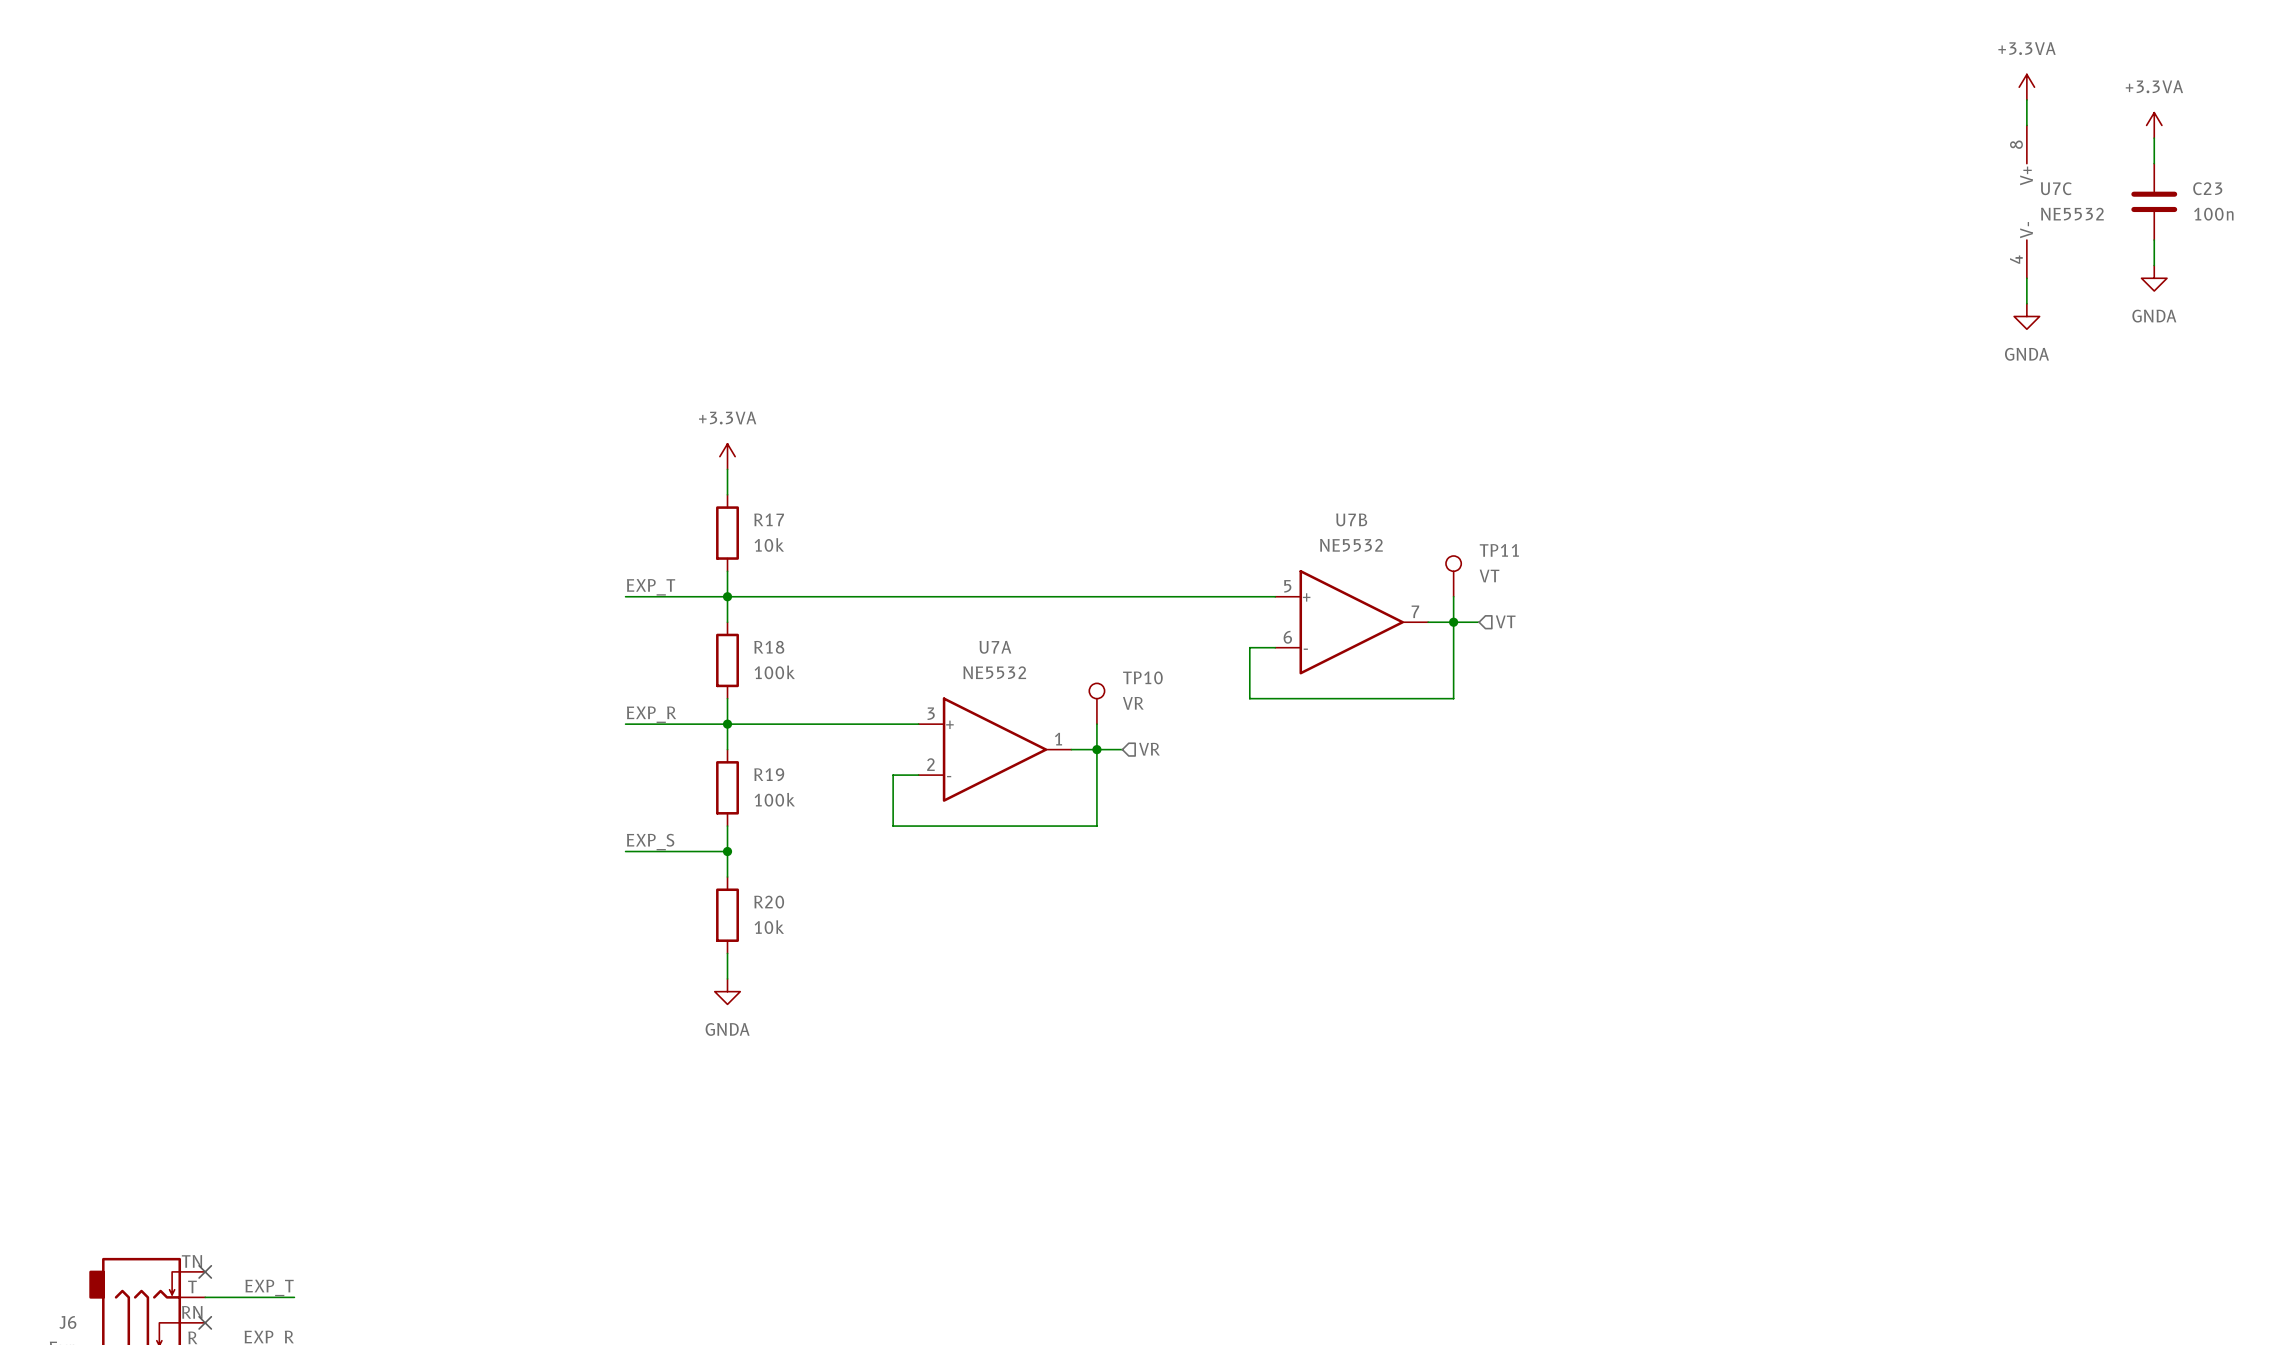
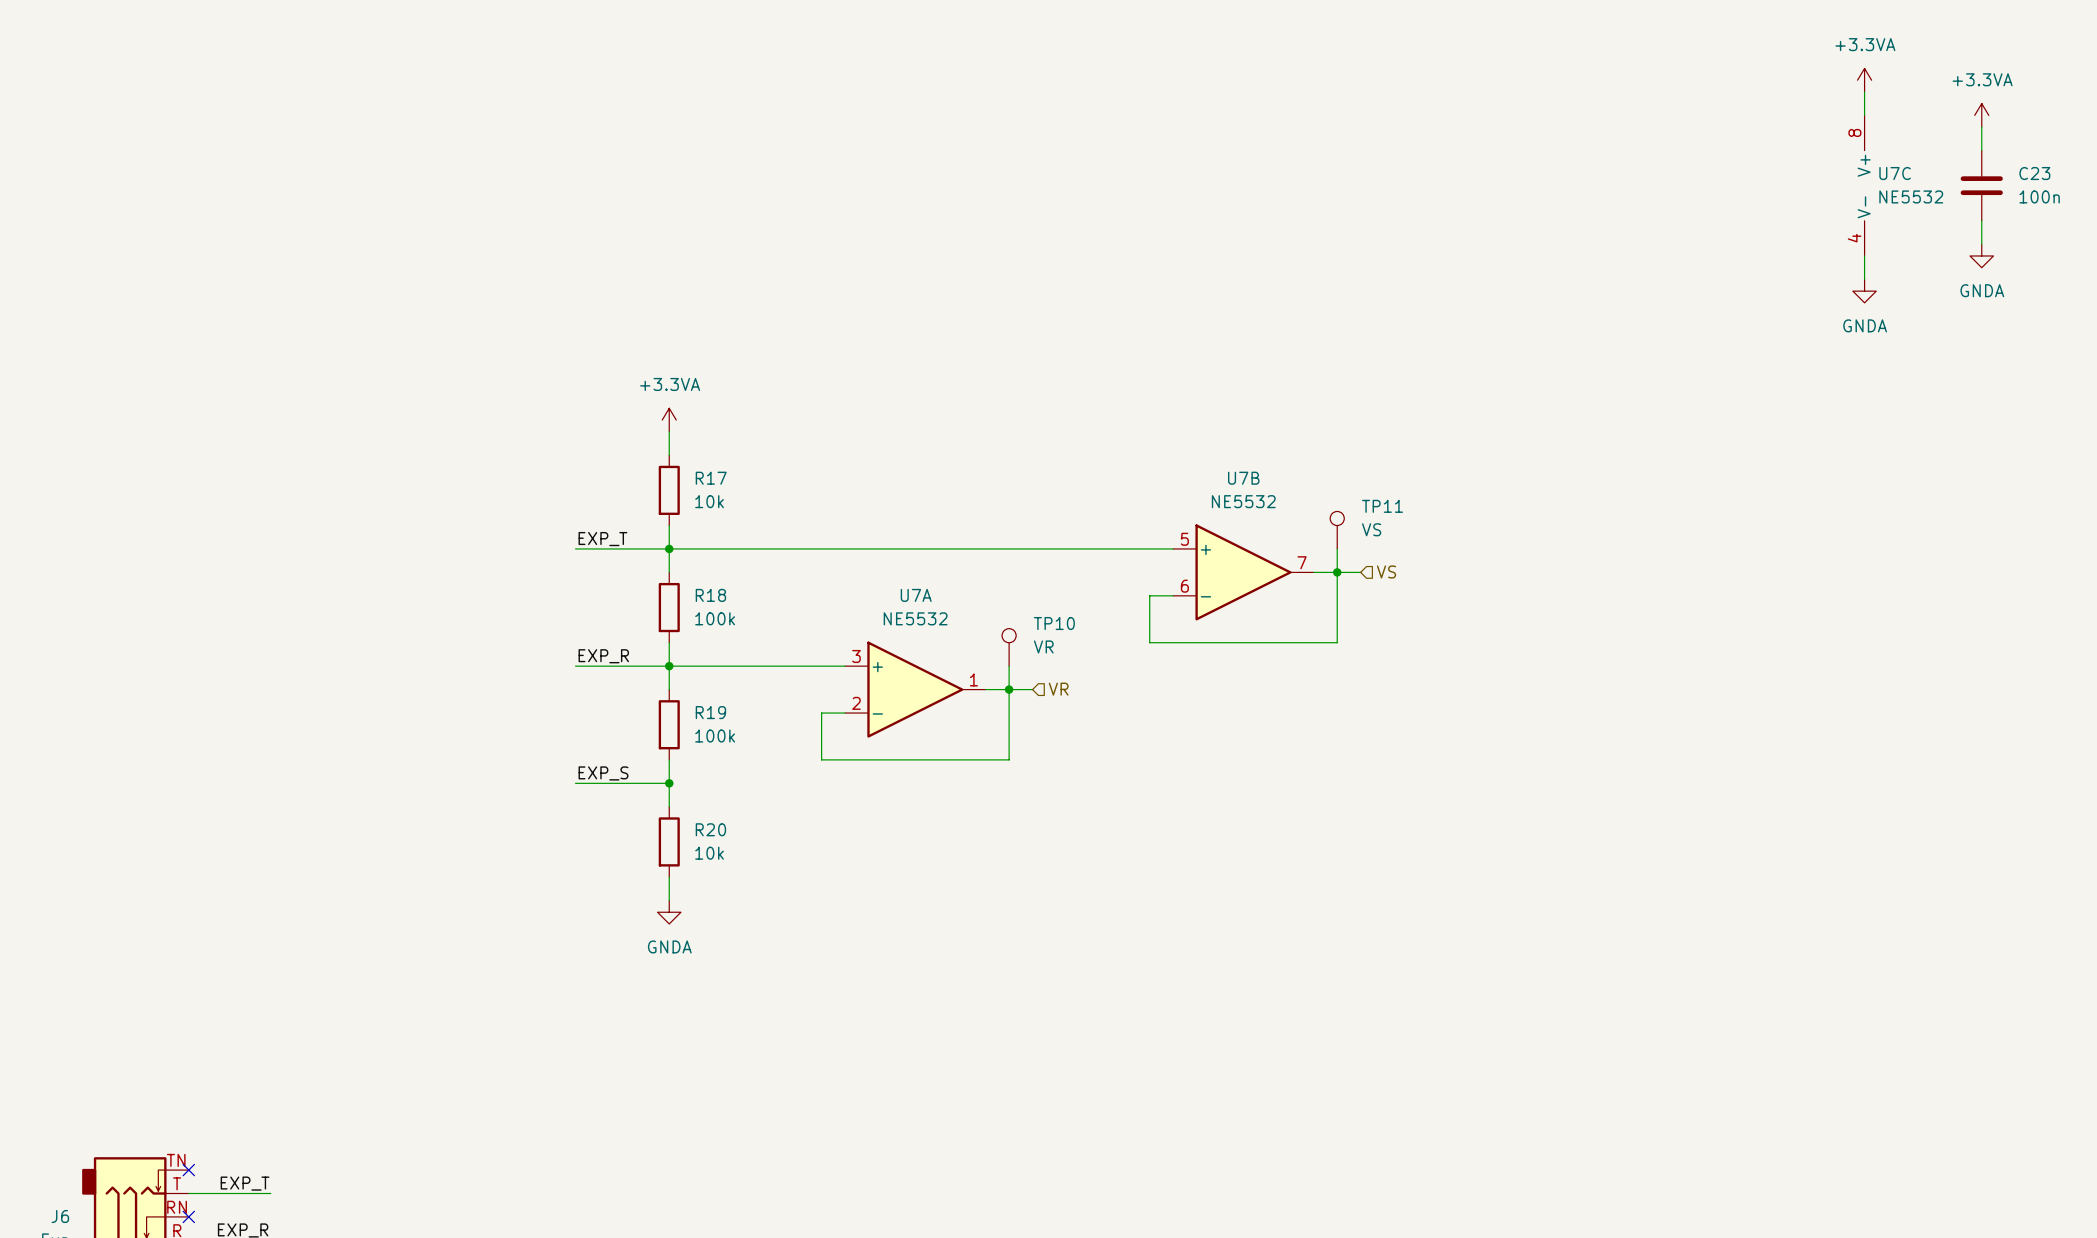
TP11 value: VT (1489, 575) -> VS (1371, 529)
hierarchical label: VT (1505, 621) -> VS (1386, 571)

